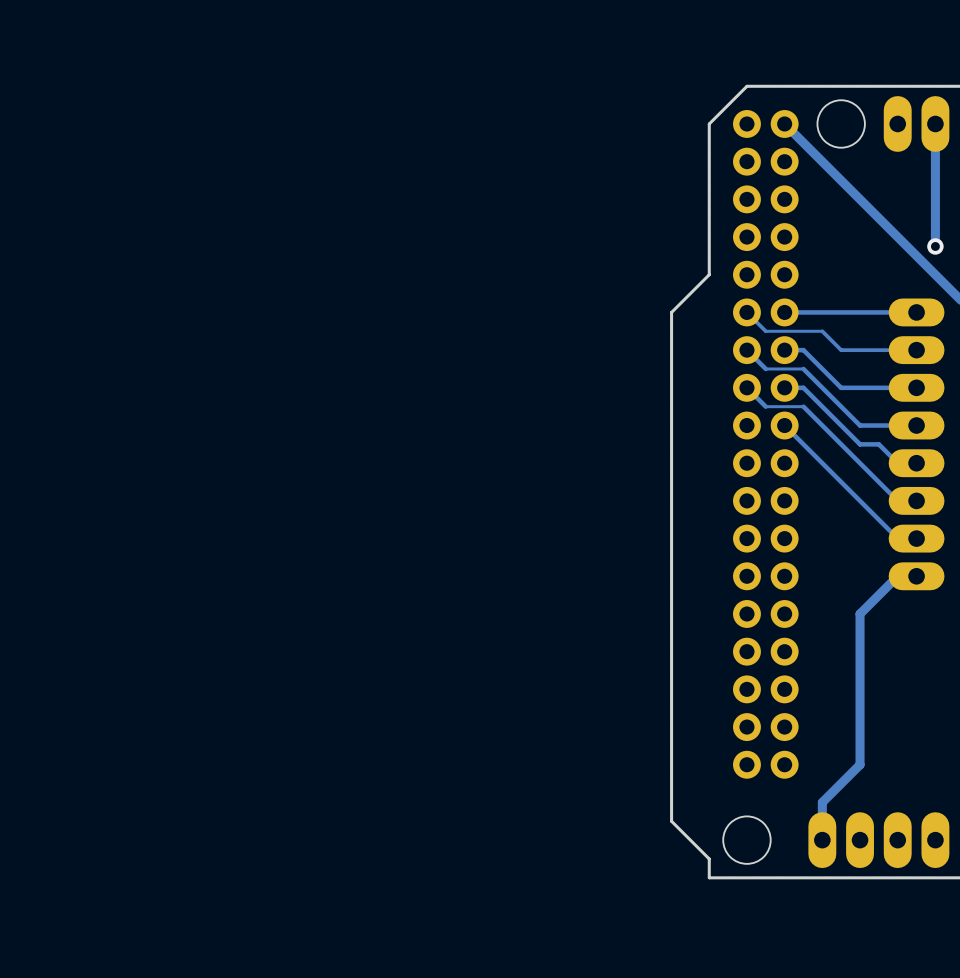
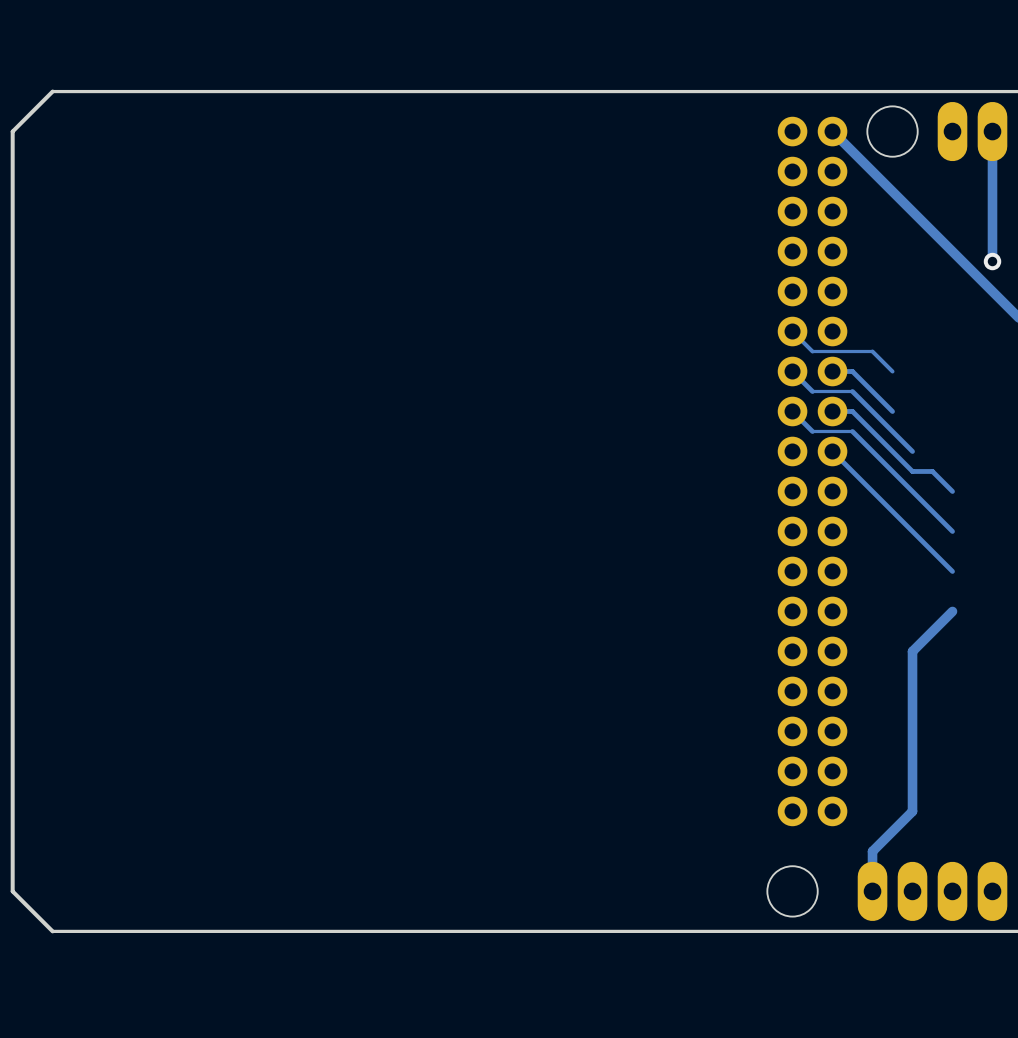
board edge: (746, 86) (709, 123) (709, 274) (671, 312) (671, 821) (709, 858) (709, 877) -> (792, 91) (52, 91) (12, 131) (12, 891) (52, 931) (752, 931)
track: (916, 312) (784, 312) -> none
track: (916, 350) (841, 350) -> none
track: (916, 387) (841, 387) -> none
track: (916, 425) (860, 425) -> none
part: (916, 444) -> none

